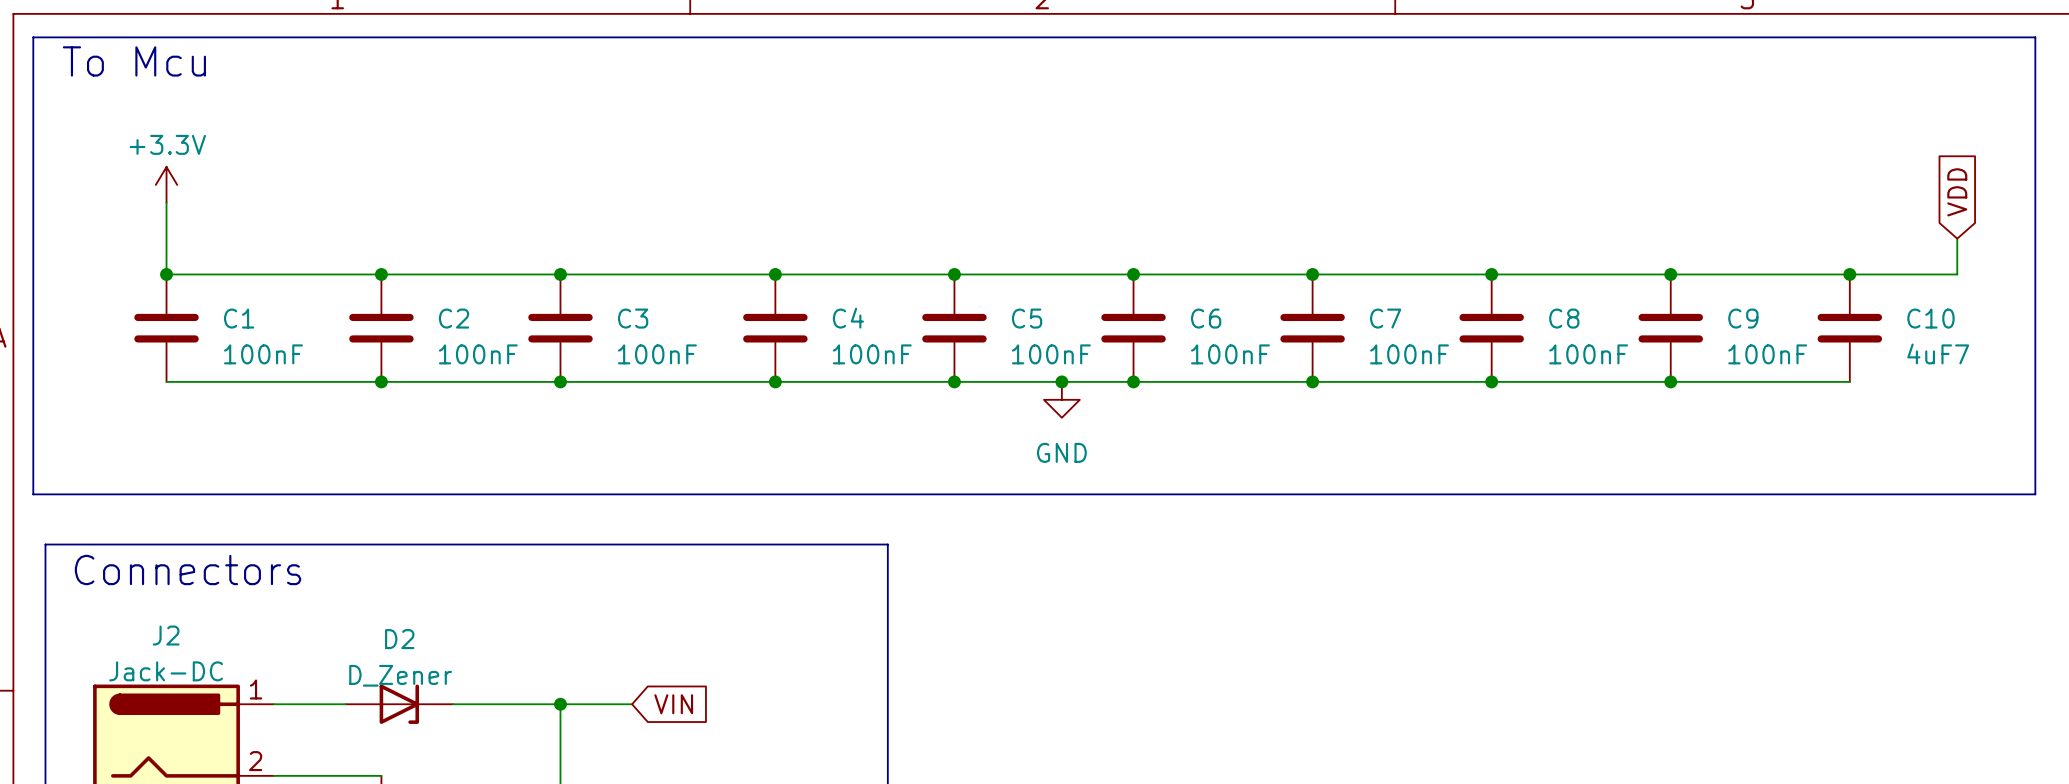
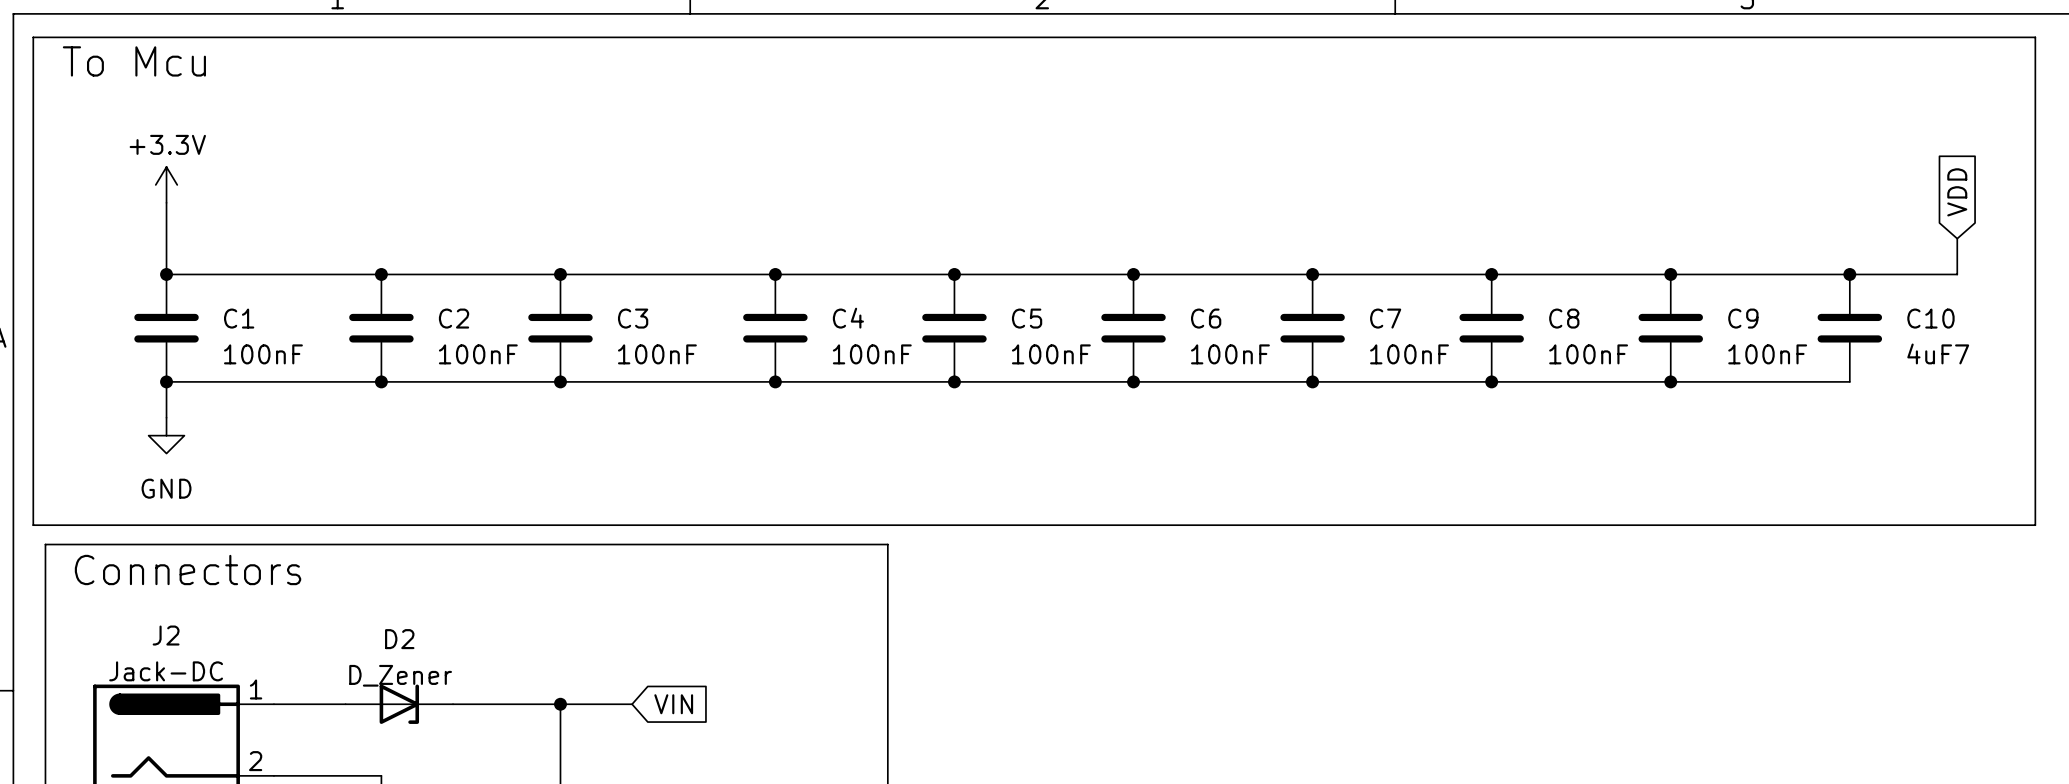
wire: none -> (166, 381) (166, 417)
junction: none -> (166, 381)
junction: (1061, 381) -> none
power symbol: GND (1061, 399) -> none
power symbol: none -> GND (166, 435)
line: (33, 494) (2035, 494) -> (33, 494) (33, 525) (2035, 525) (2035, 494)

